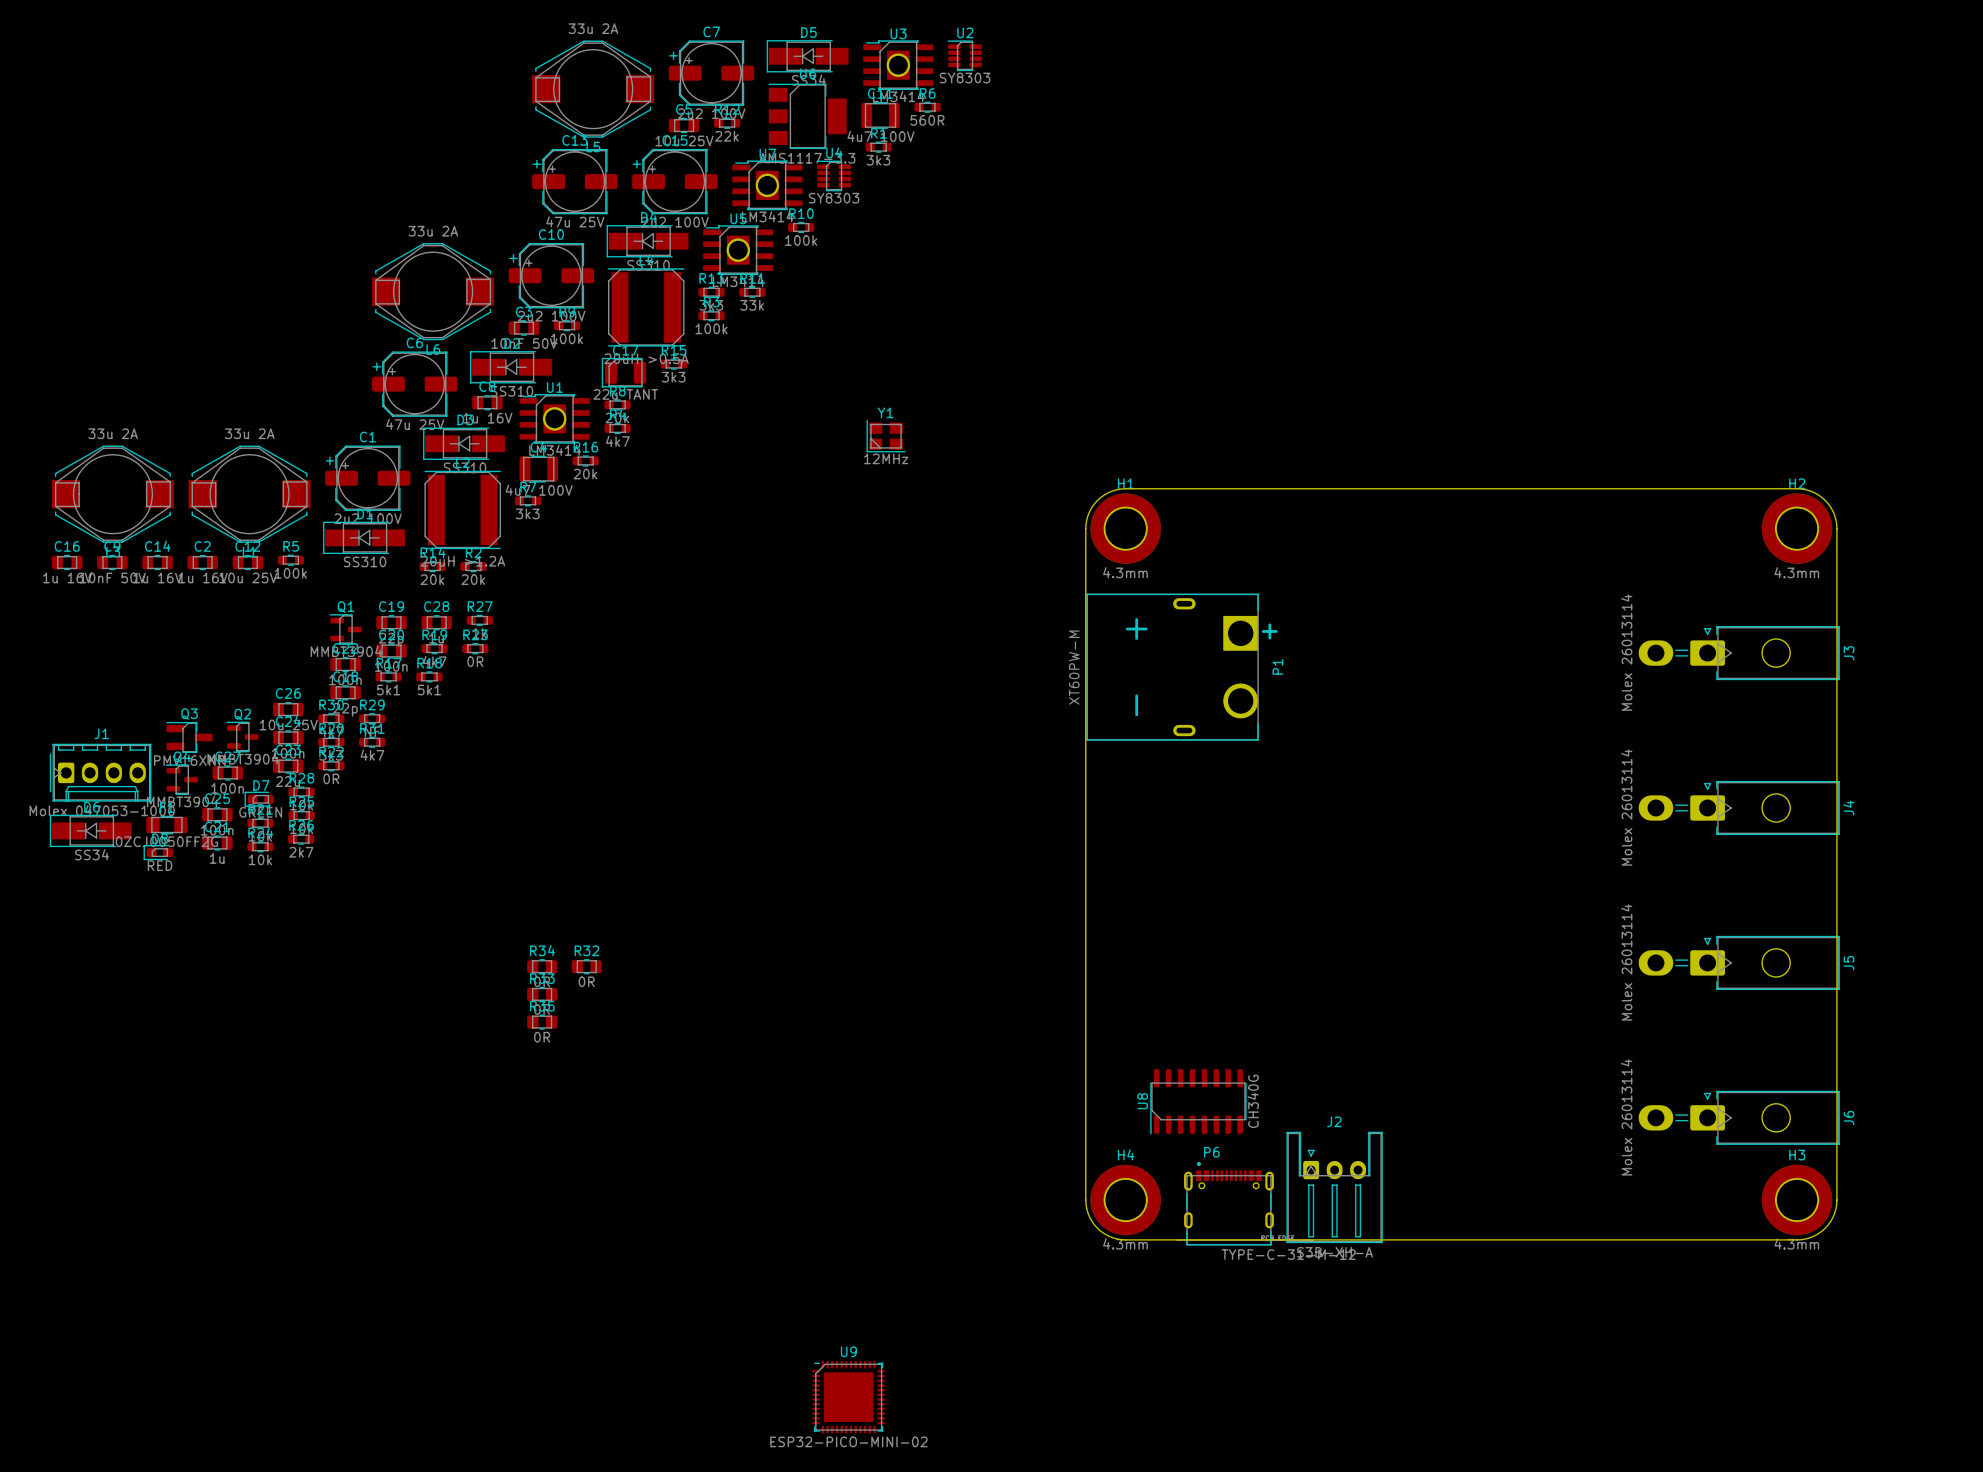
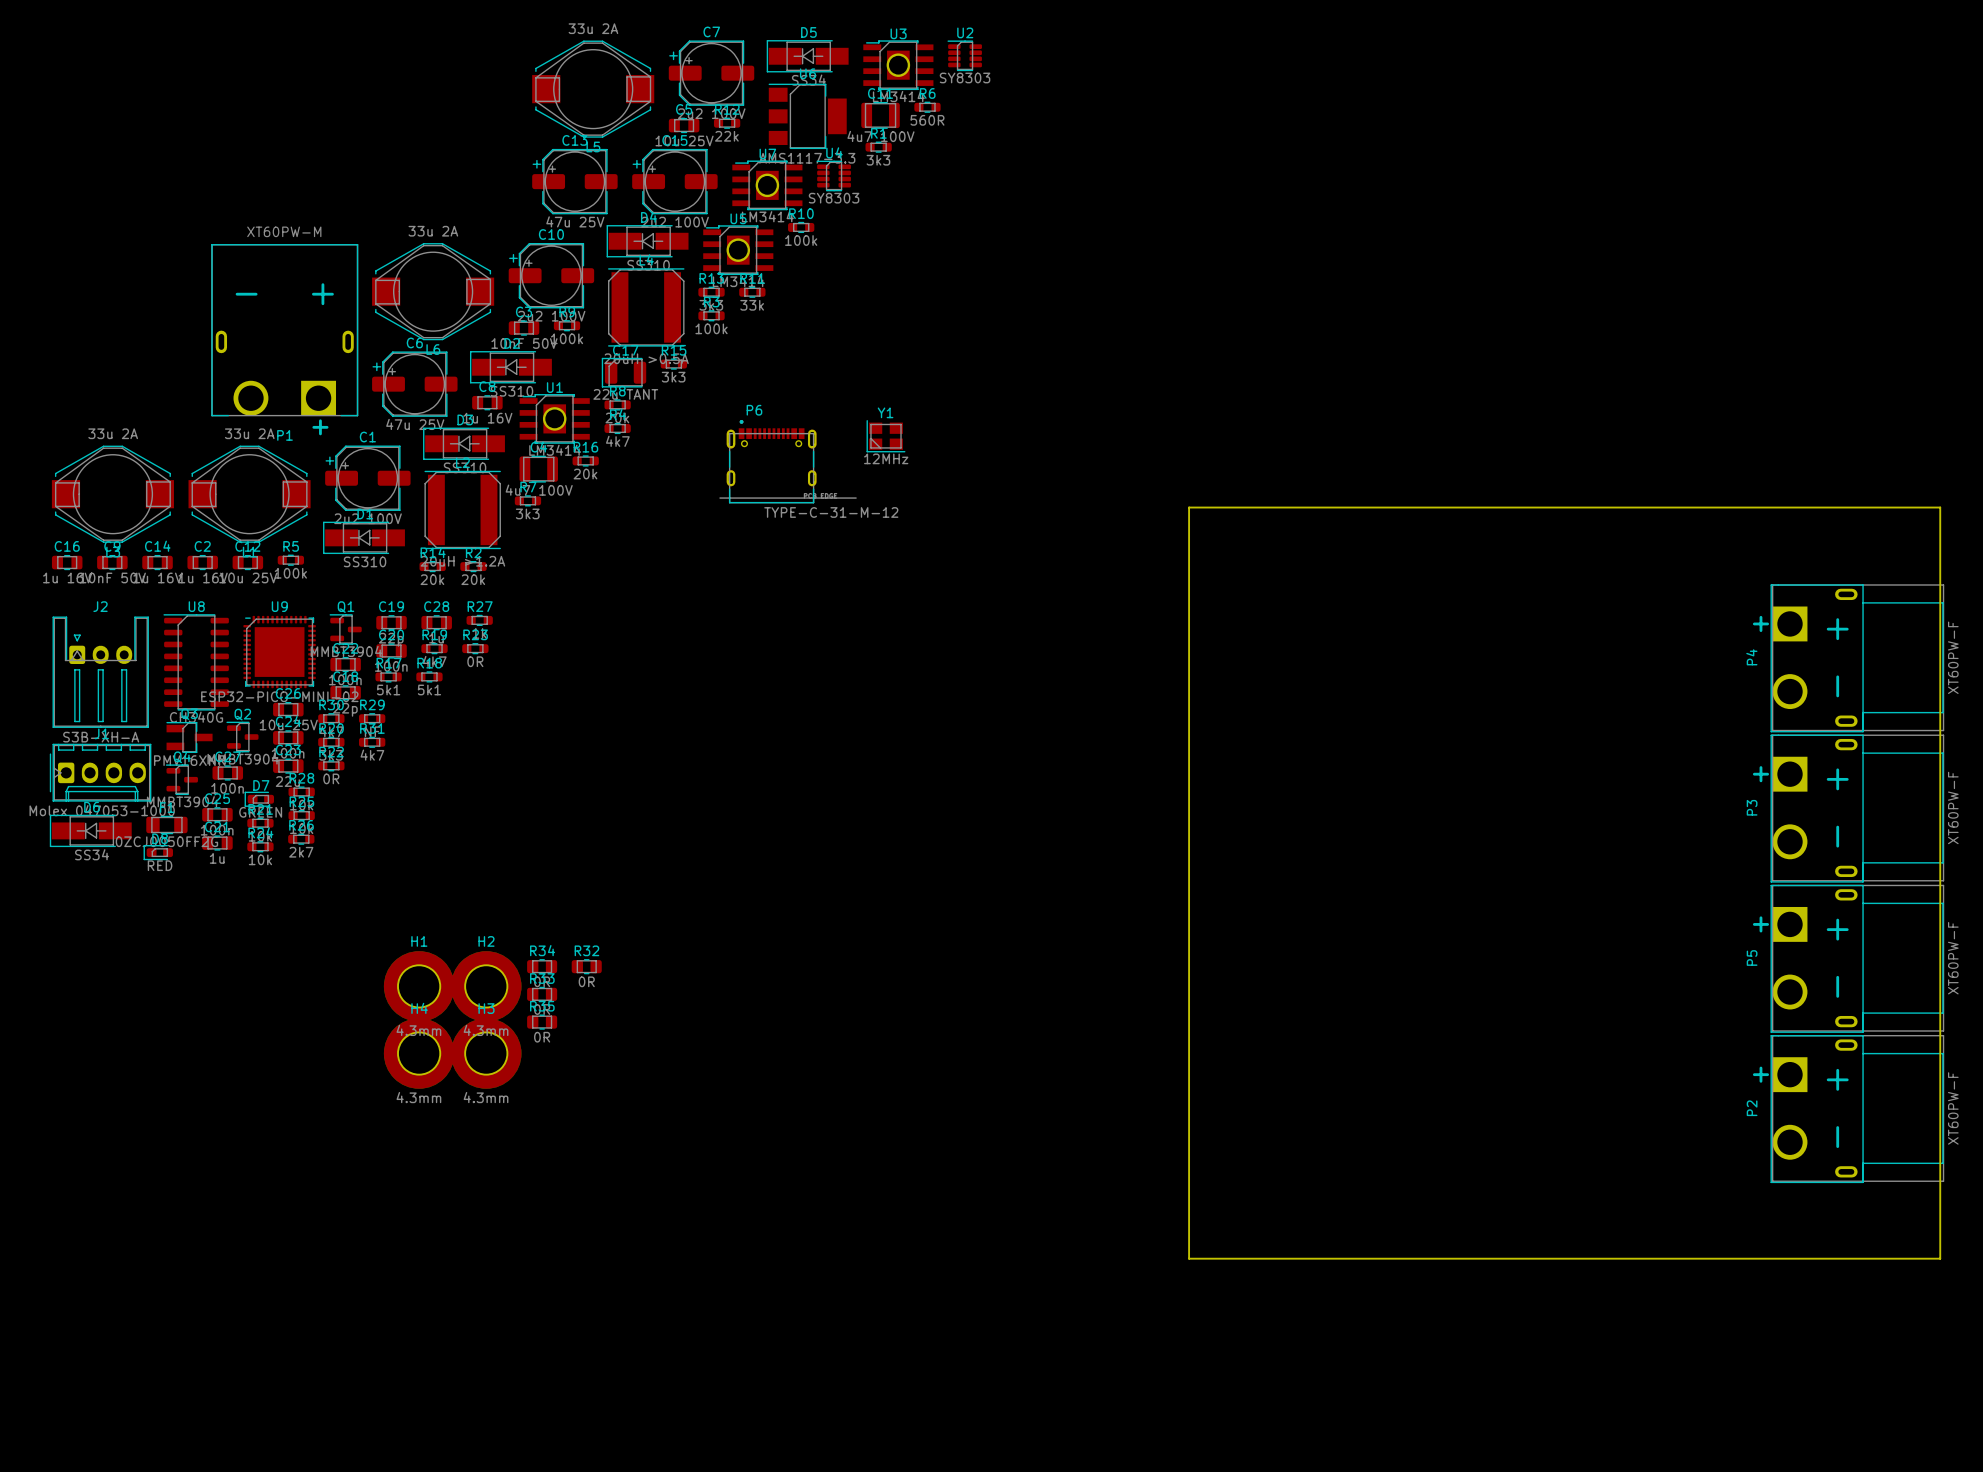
board edge: (1125, 488) (1797, 488) (1810, 490) (1825, 500) (1834, 515) (1836, 528) (1836, 1200) (1834, 1213) (1825, 1228) (1810, 1237) (1797, 1239) (1125, 1239) (1112, 1237) (1097, 1228) (1088, 1213) (1085, 1200) (1085, 528) (1088, 515) (1097, 500) (1112, 490) (1125, 488) -> (1189, 507) (1189, 1258) (1940, 1258) (1940, 507) (1189, 507)
H1 position: (1125, 528) -> (419, 986)
H2 position: (1797, 528) -> (486, 986)
J3: Molex 26013114 (1739, 653) -> none
P4: none -> XT60PW-F (1848, 658)
P1 rotation: 0° (1182, 667) -> 90° clockwise (284, 339)
P1 position: (1182, 667) -> (284, 339)
J4: Molex 26013114 (1739, 807) -> none
P3: none -> XT60PW-F (1848, 808)
P5: none -> XT60PW-F (1848, 958)
J5: Molex 26013114 (1739, 962) -> none
U8 rotation: 0° (1198, 1101) -> 90° clockwise (196, 662)
U8 position: (1198, 1101) -> (196, 662)
P2: none -> XT60PW-F (1848, 1109)
J6: Molex 26013114 (1739, 1117) -> none
J2 position: (1334, 1187) -> (100, 672)
H4 position: (1125, 1200) -> (419, 1053)
H3 position: (1797, 1200) -> (486, 1053)
P6 position: (1245, 1203) -> (788, 461)
U9 position: (848, 1397) -> (279, 652)

